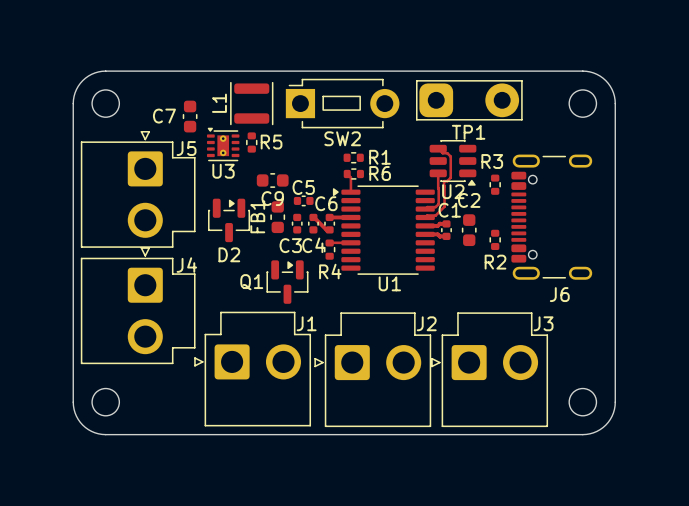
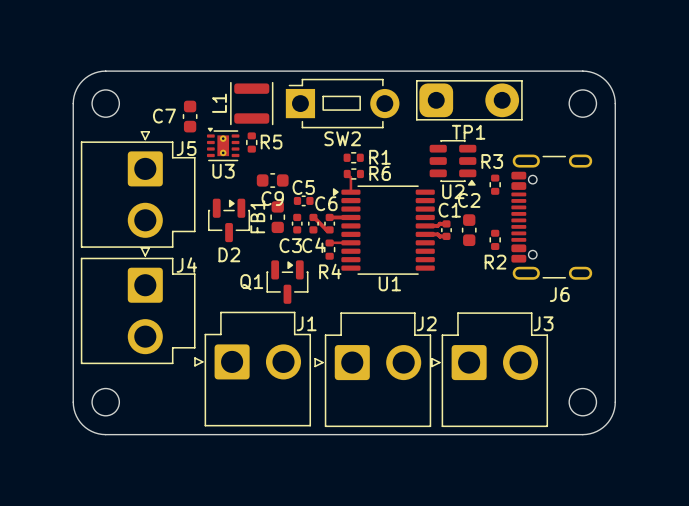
track: (438, 148) (450, 156) (450, 177) (444, 181) (444, 206) (435, 215) (427, 215) (425, 217) -> none
track: (438, 173) (438, 204) (435, 207) (427, 207) (425, 209) -> none

